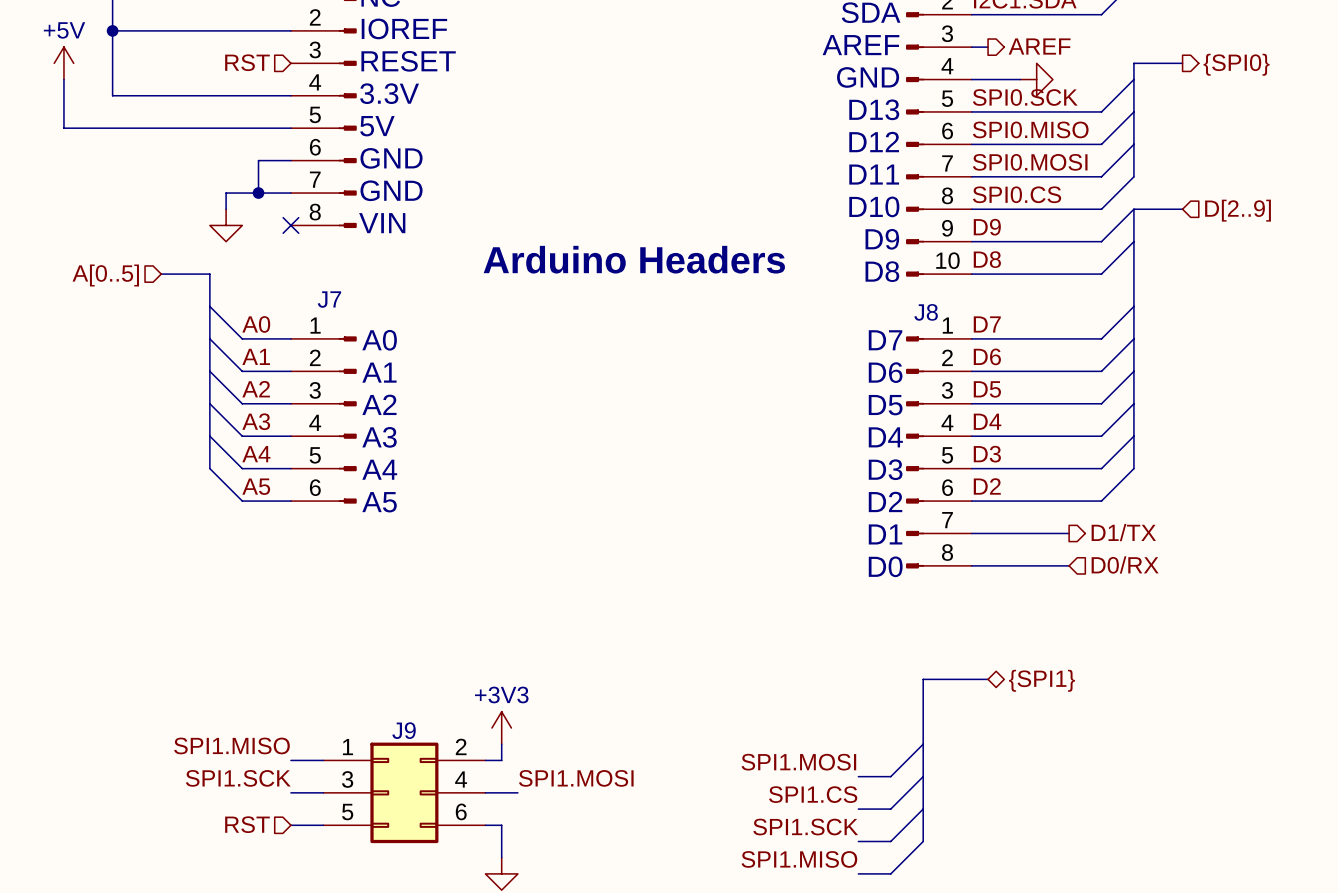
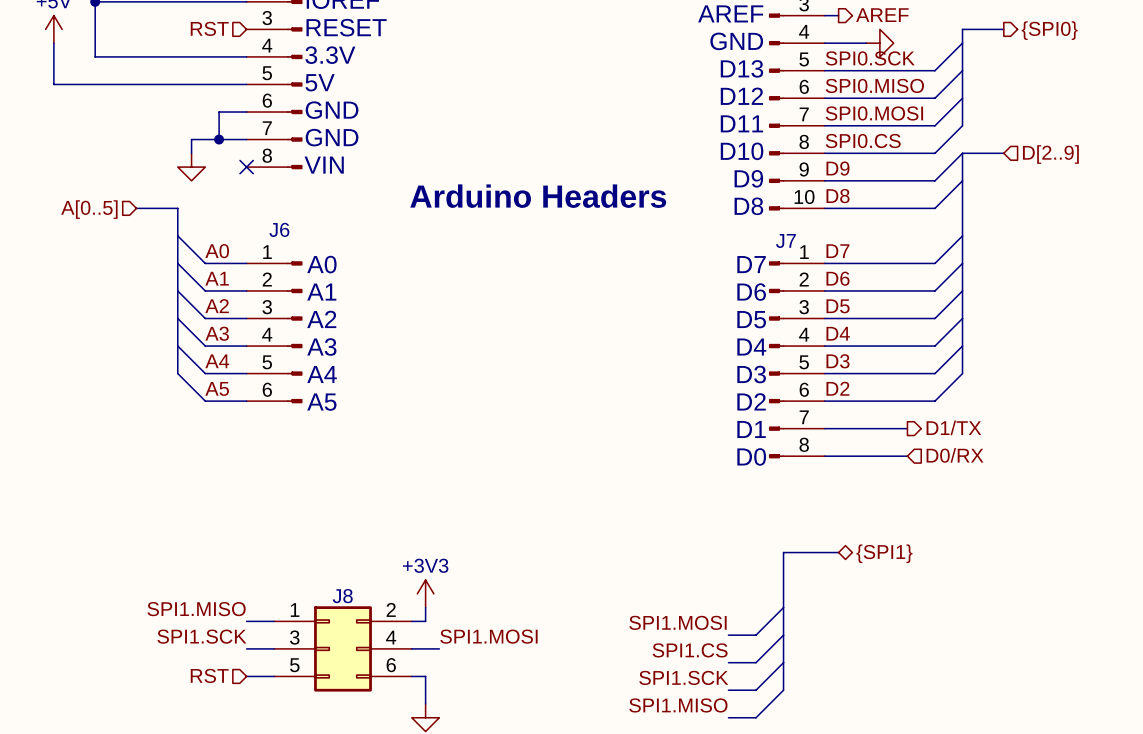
J7 name: J7 (329, 299) -> J6 (279, 229)
J8 name: J8 (926, 312) -> J7 (785, 241)
J9 name: J9 (404, 730) -> J8 (342, 596)

